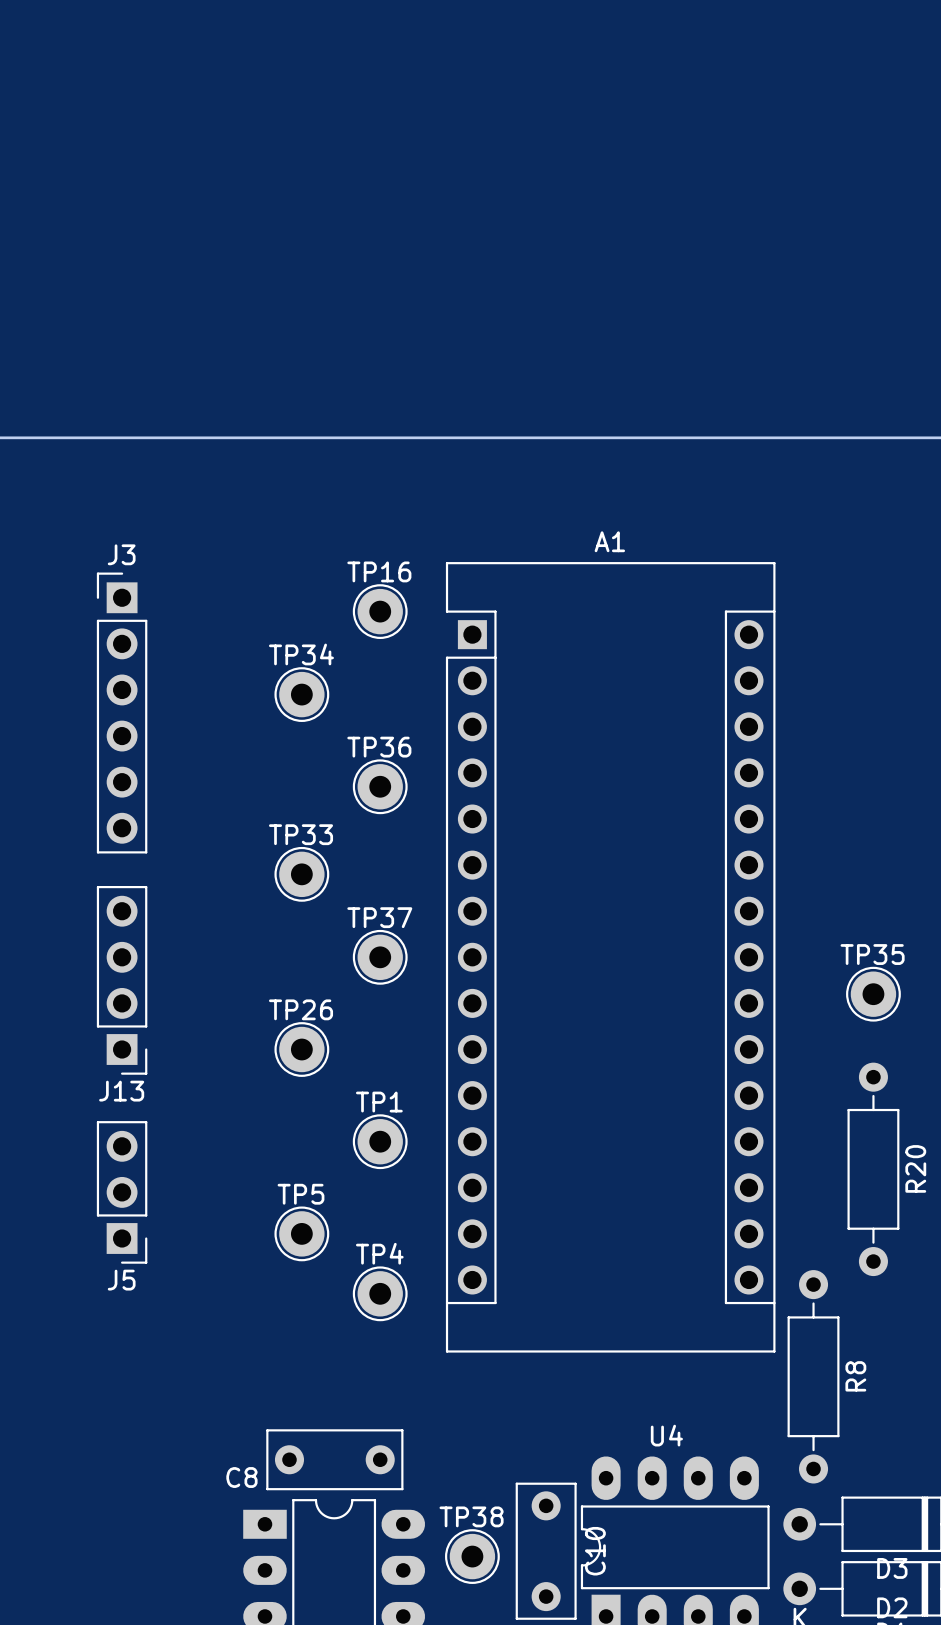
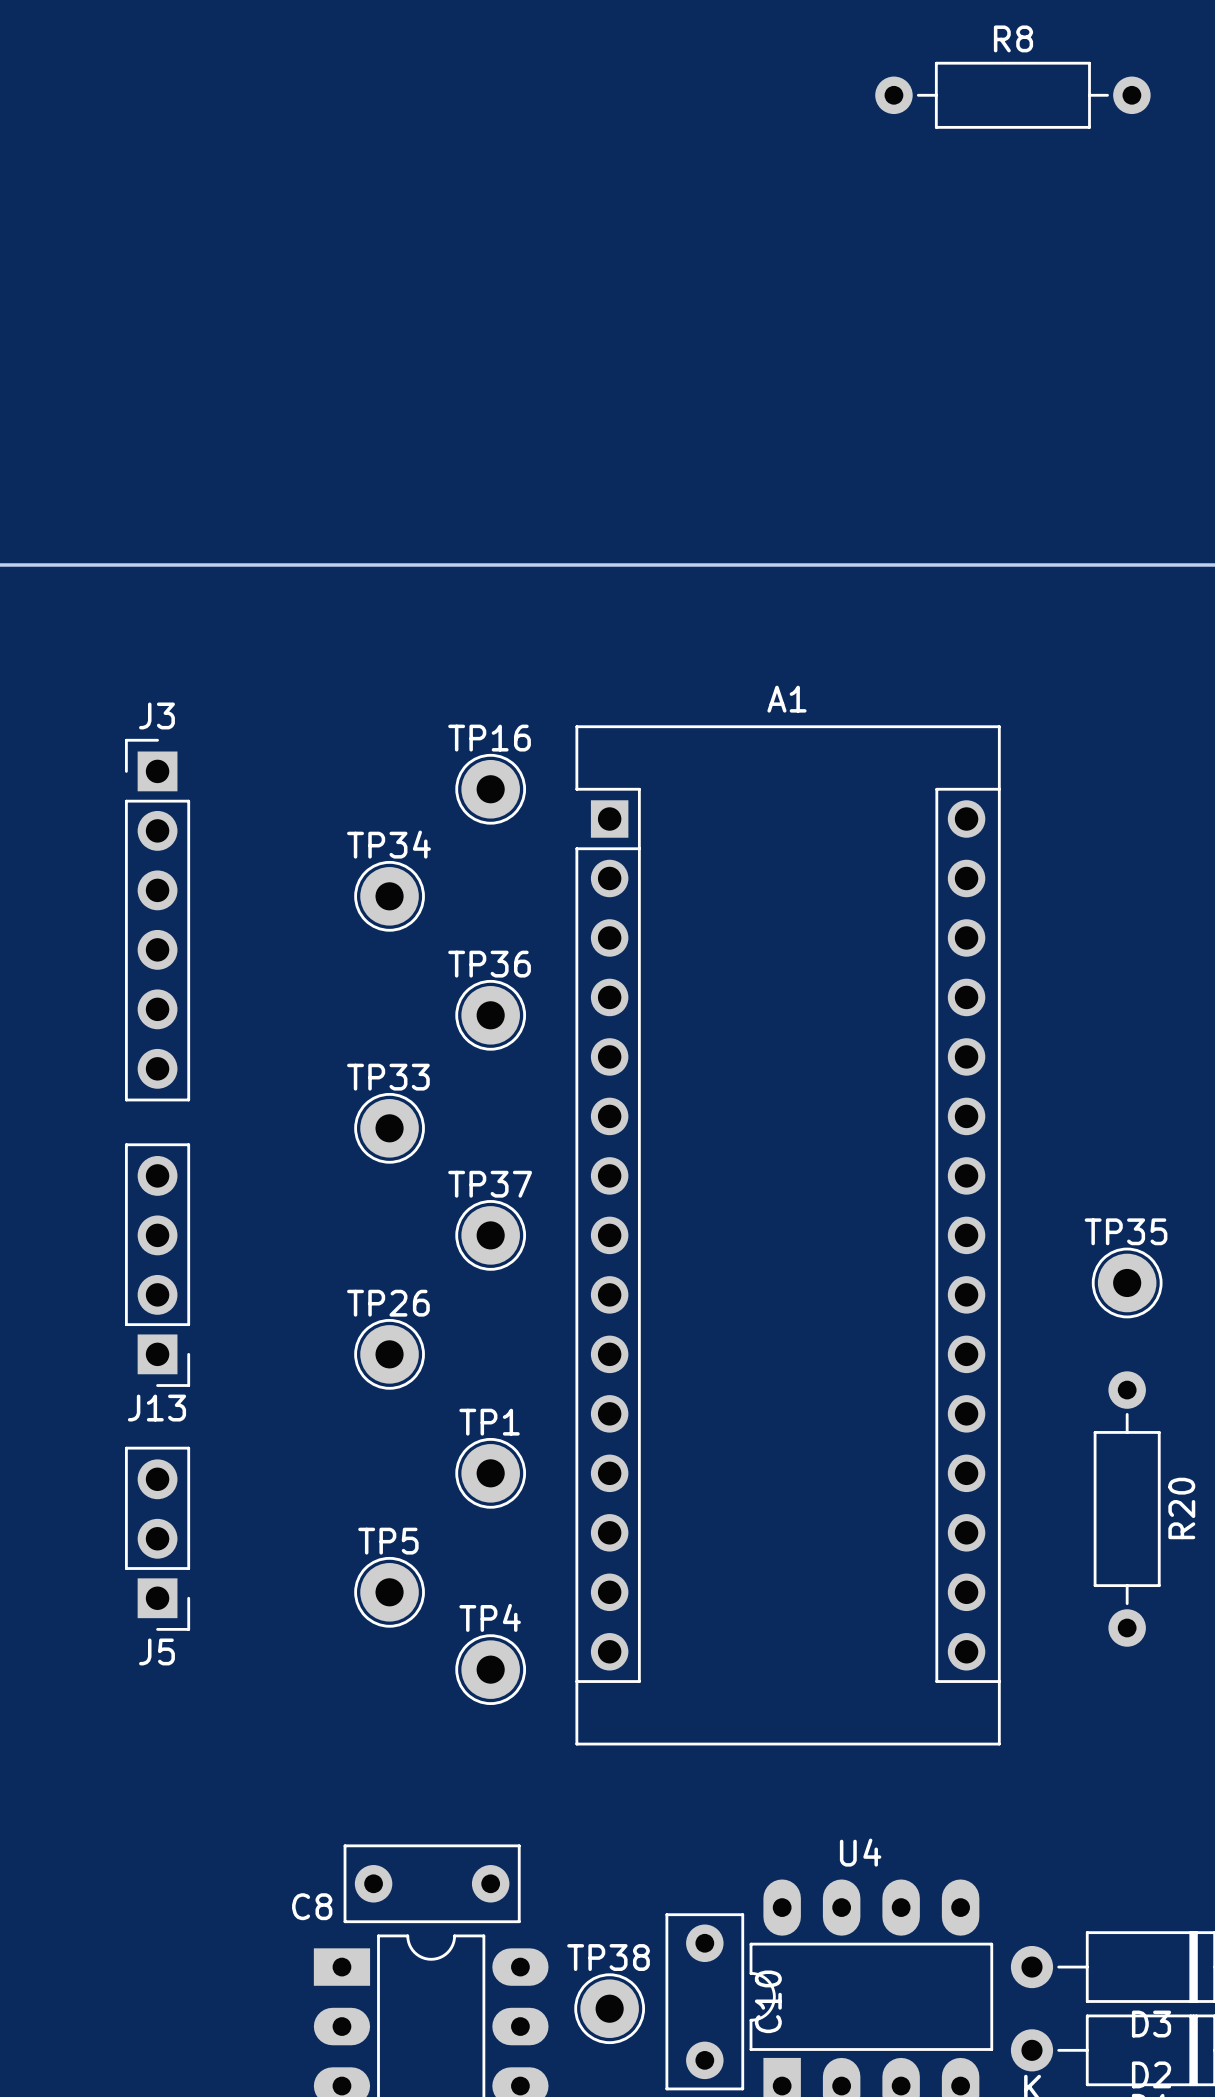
R8 rotation: 0° (813, 1376) -> 90° clockwise (1012, 95)
R8 position: (813, 1376) -> (1012, 95)
R8 name position: R8 (855, 1376) -> R8 (1013, 38)

